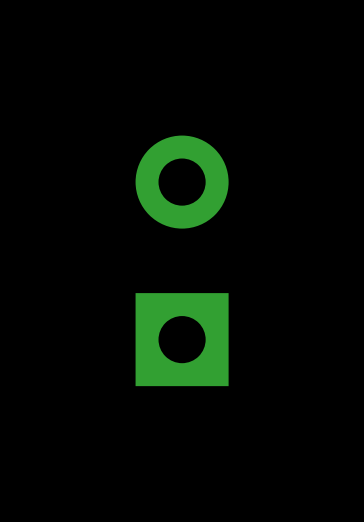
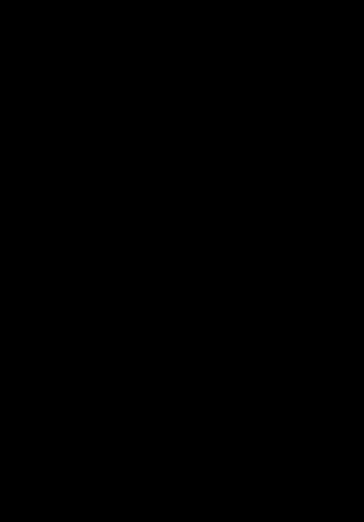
part: (182, 260) -> none

